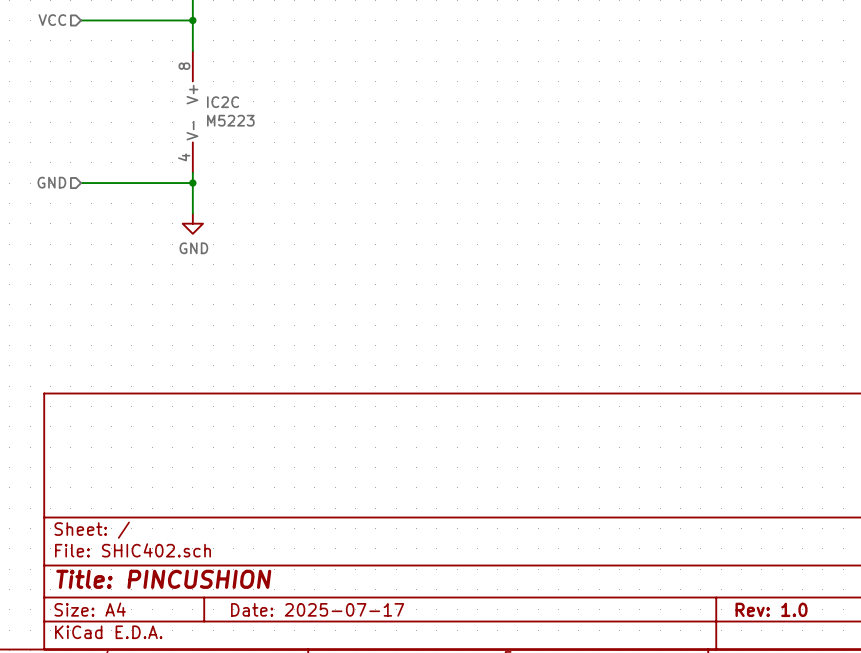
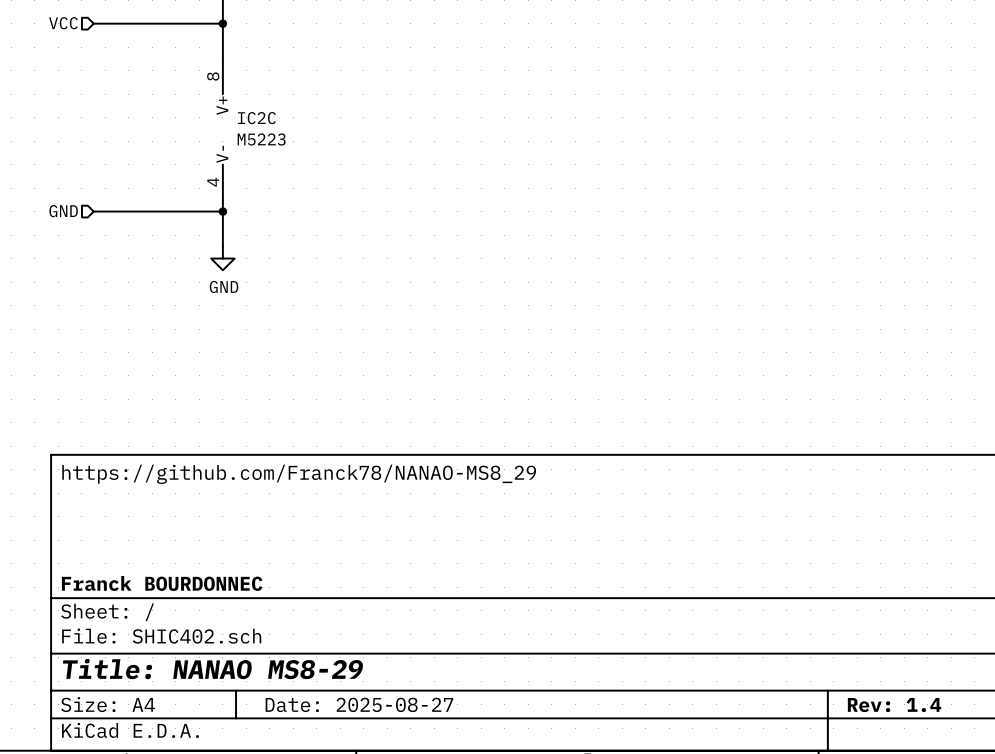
title block: none -> https://github.com/Franck78/NANAO-MS8_29 (299, 474)
title block: none -> Franck BOURDONNEC (162, 583)
title block: Title: PINCUSHION (163, 579) -> Title: NANAO MS8-29 (212, 669)
title block: Date: 2025-07-17 (317, 609) -> Date: 2025-08-27 (359, 704)
title block: Rev: 1.0 (771, 609) -> Rev: 1.4 (894, 705)

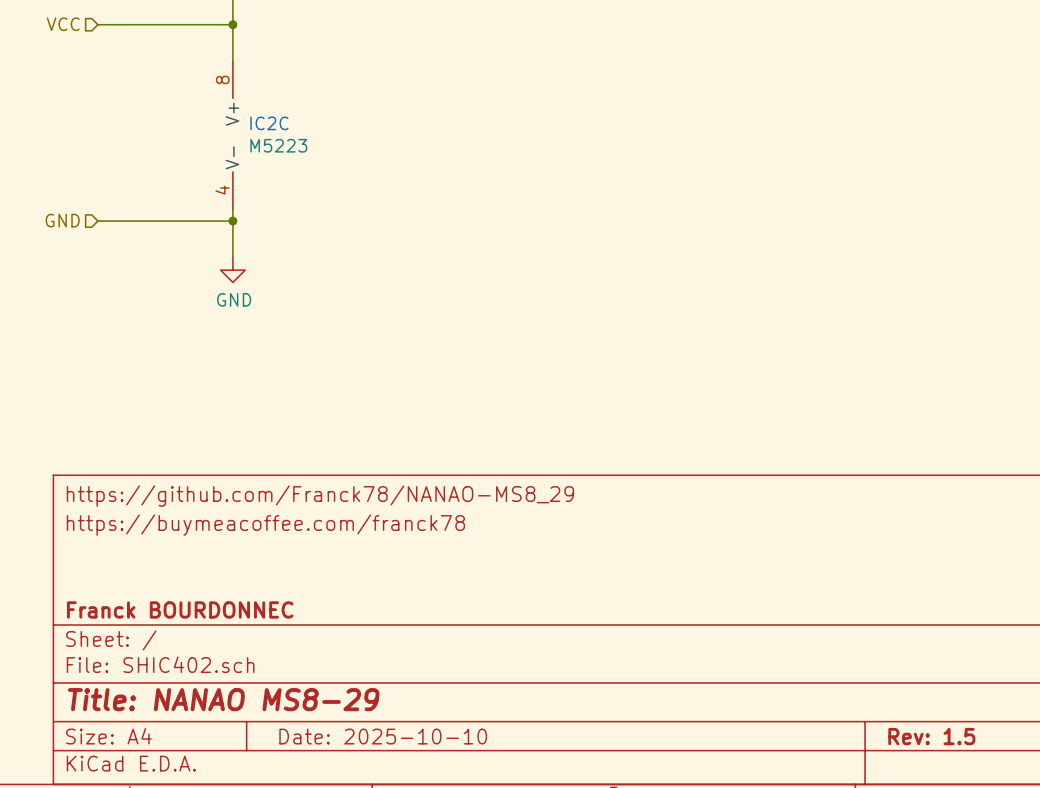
title block: none -> https://buymeacoffee.com/franck78 (265, 525)
title block: Date: 2025-08-27 (359, 704) -> Date: 2025-10-10 (383, 736)
title block: Rev: 1.4 (894, 705) -> Rev: 1.5 (931, 736)

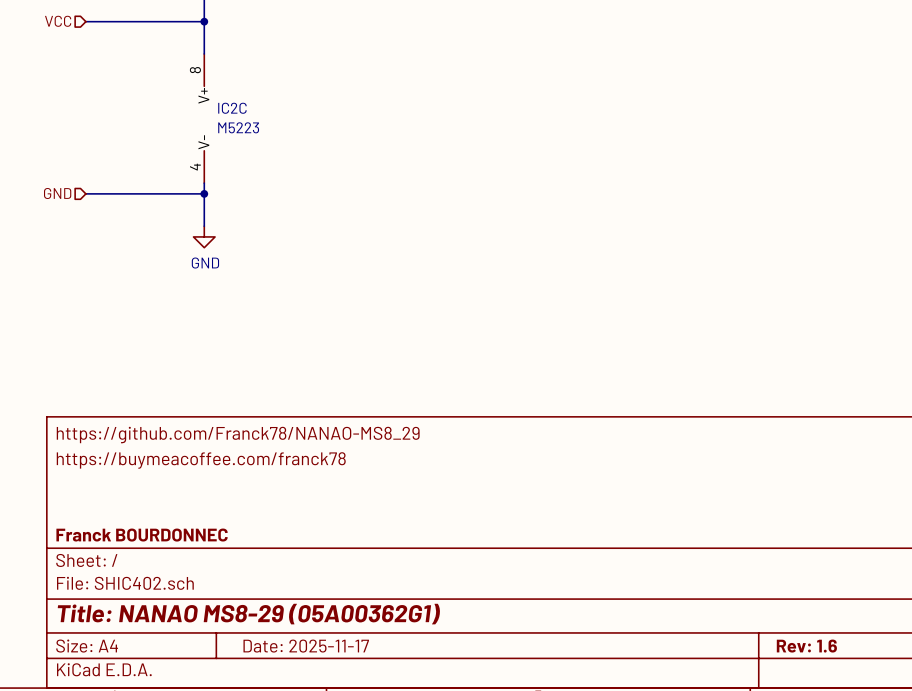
title block: Title: NANAO MS8-29 (223, 699) -> Title: NANAO MS8-29 (05A00362G1) (248, 614)
title block: Date: 2025-10-10 (383, 736) -> Date: 2025-11-17 (306, 646)
title block: Rev: 1.5 (931, 736) -> Rev: 1.6 (806, 646)

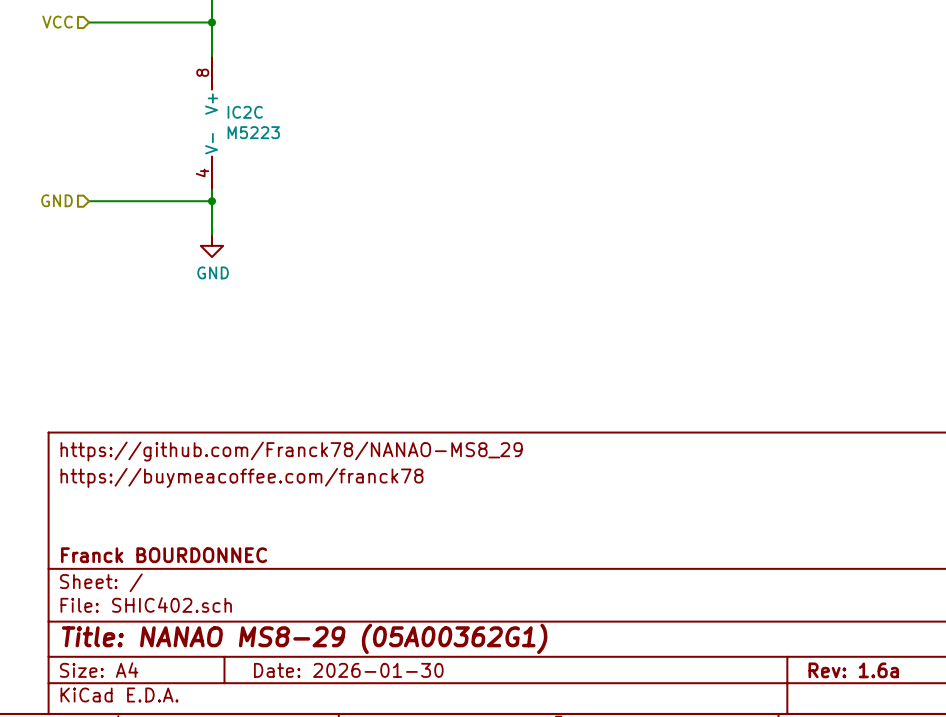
title block: Date: 2025-11-17 (306, 646) -> Date: 2026-01-30 (348, 670)
title block: Rev: 1.6 (806, 646) -> Rev: 1.6a (853, 670)

